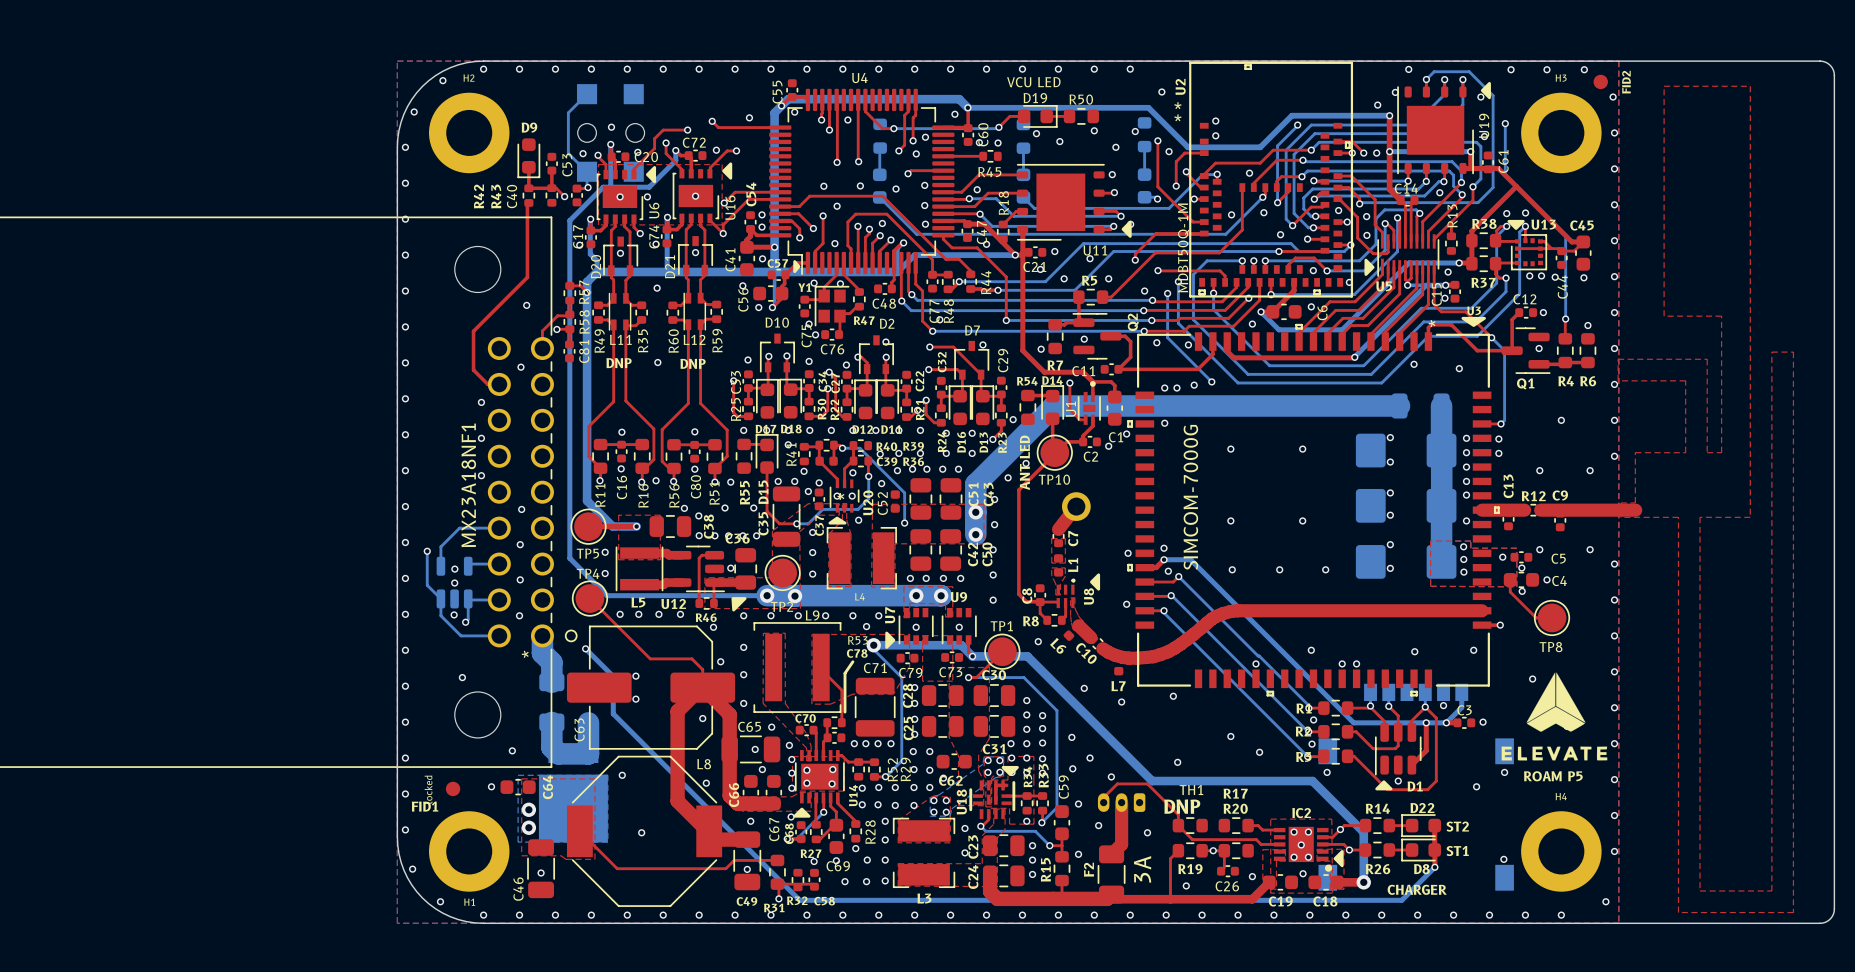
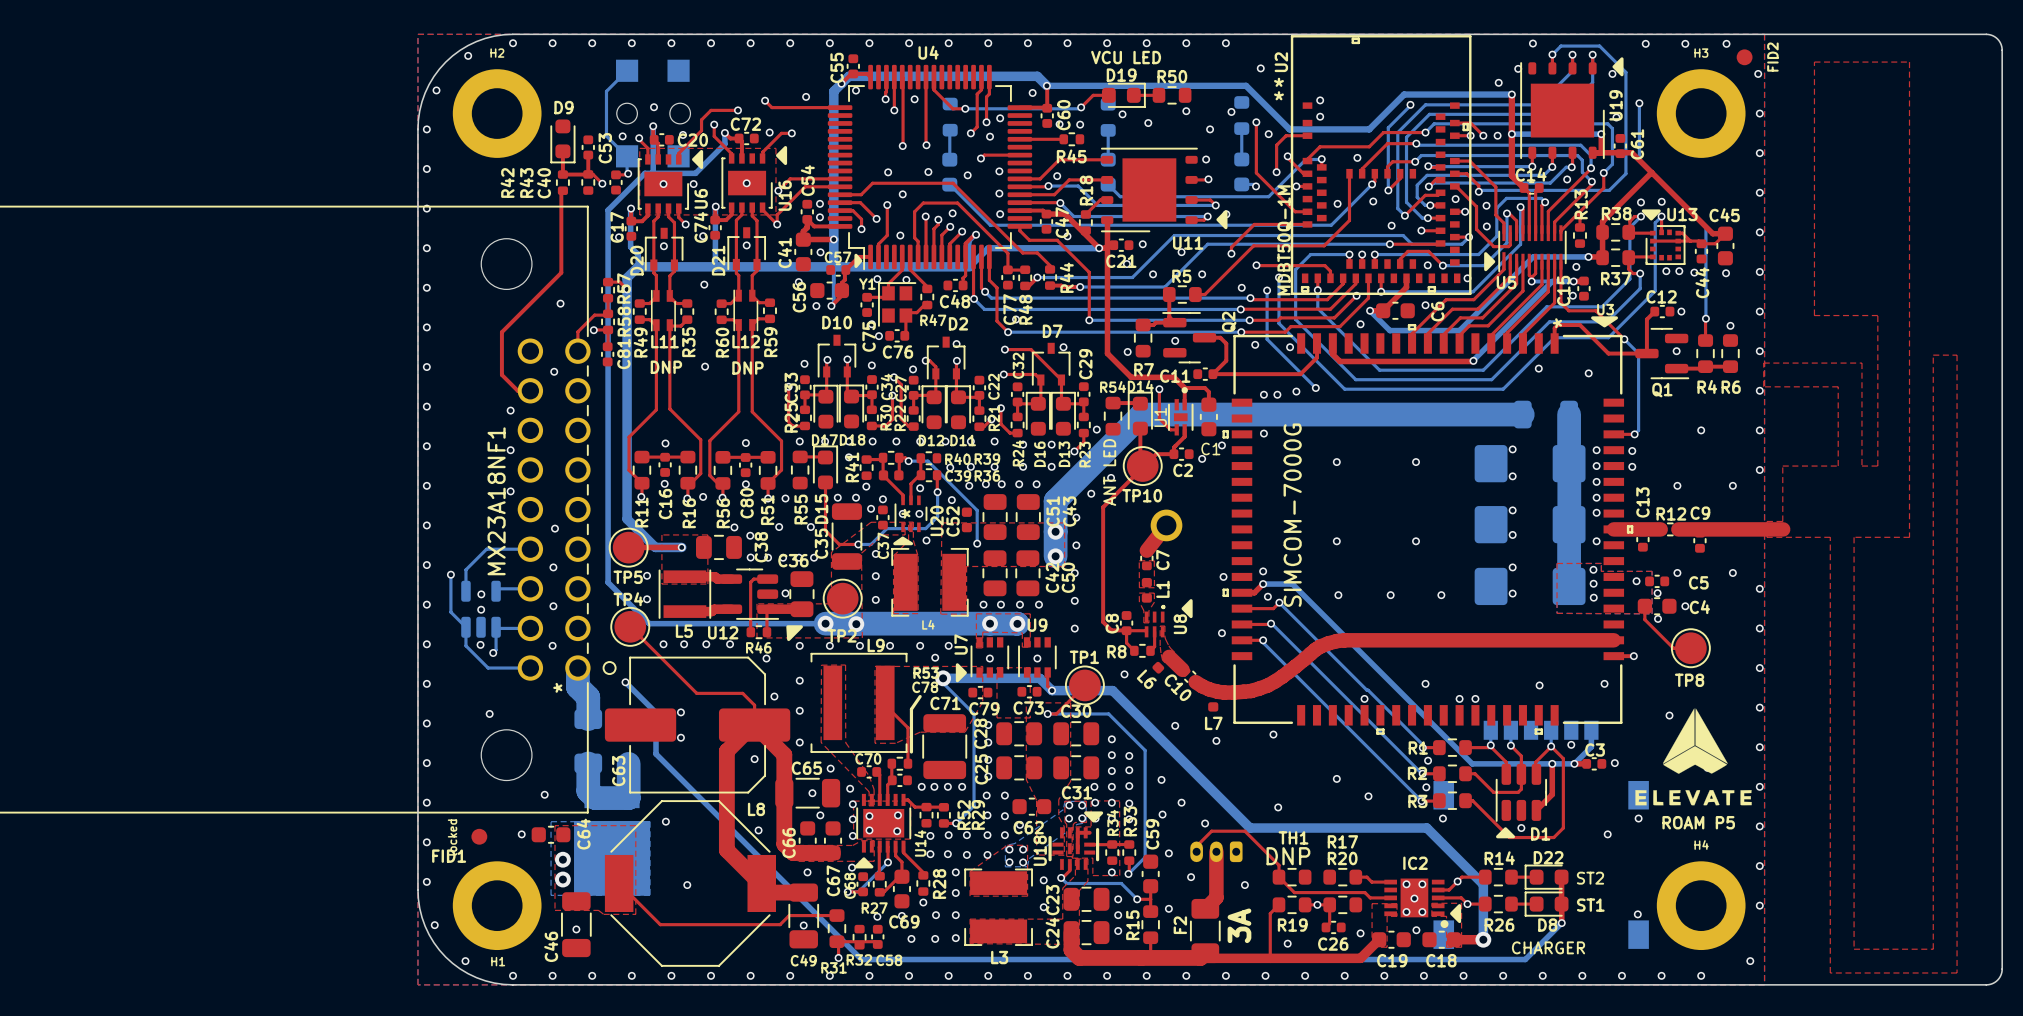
top zone outline: (1270, 819) (1331, 819) (1332, 893) (1270, 893) (1270, 819) -> none

